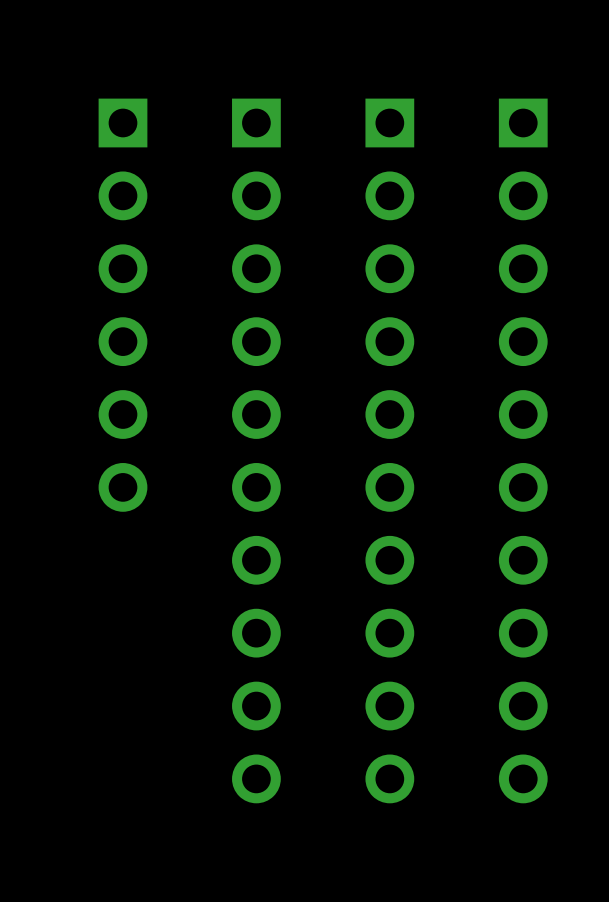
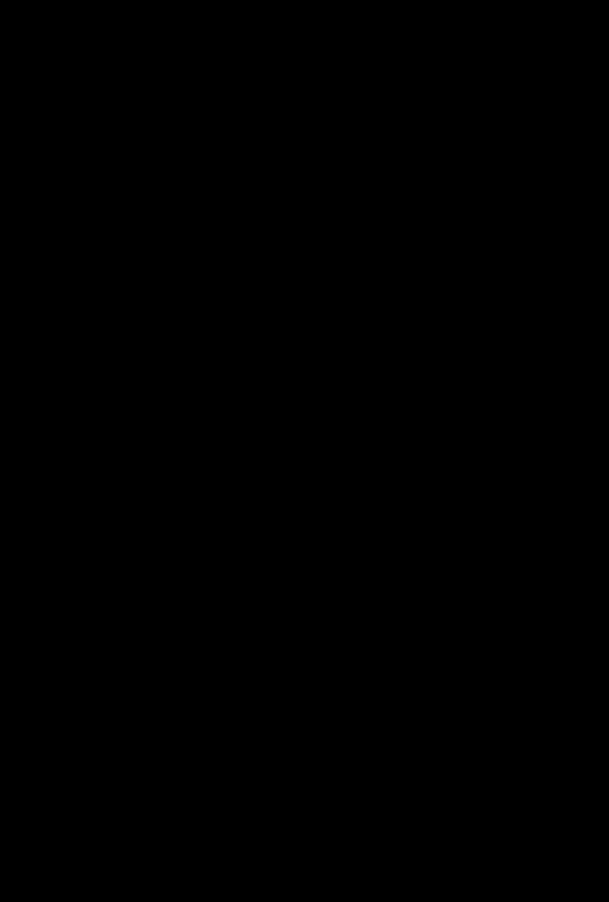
part: (122, 305) -> none
part: (256, 450) -> none
part: (389, 450) -> none
part: (523, 450) -> none

